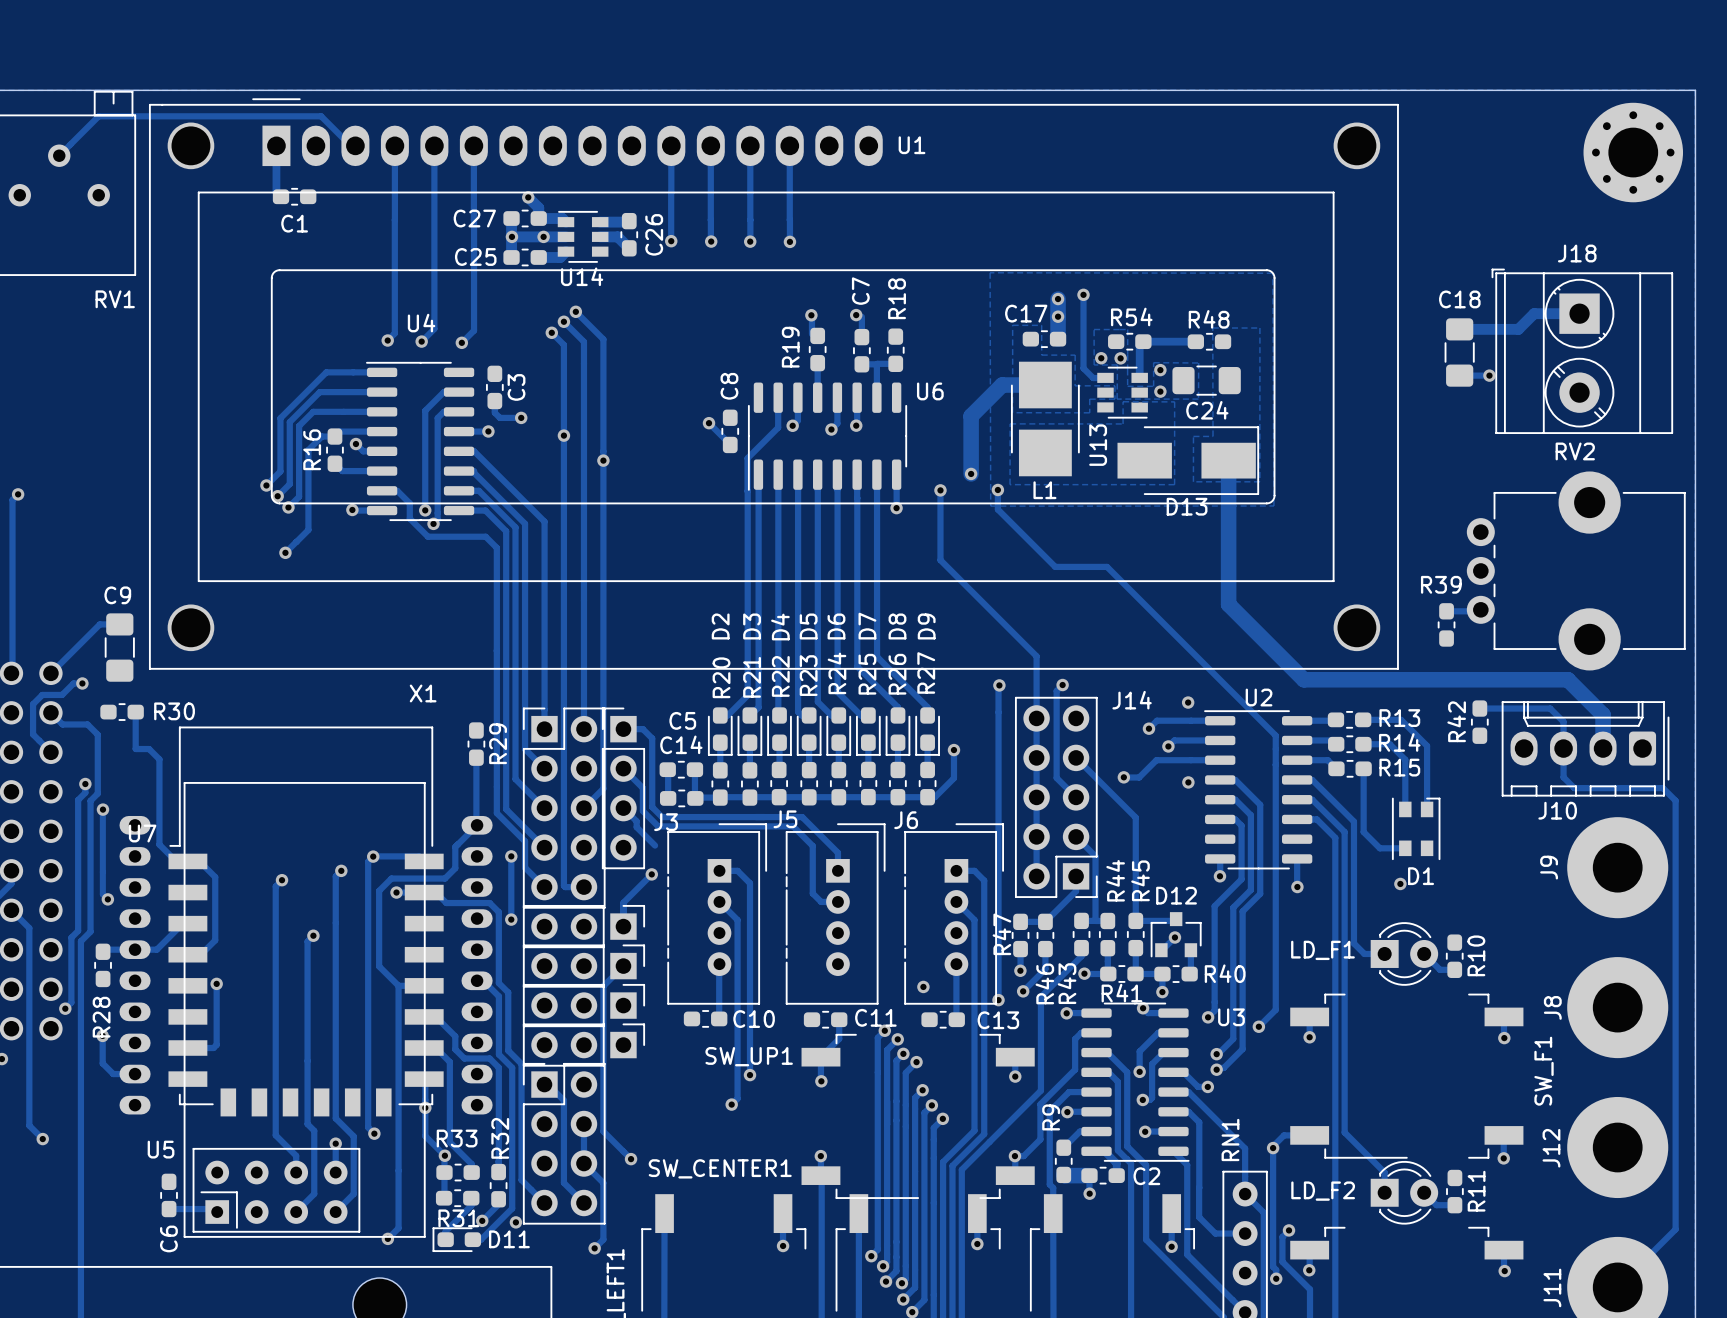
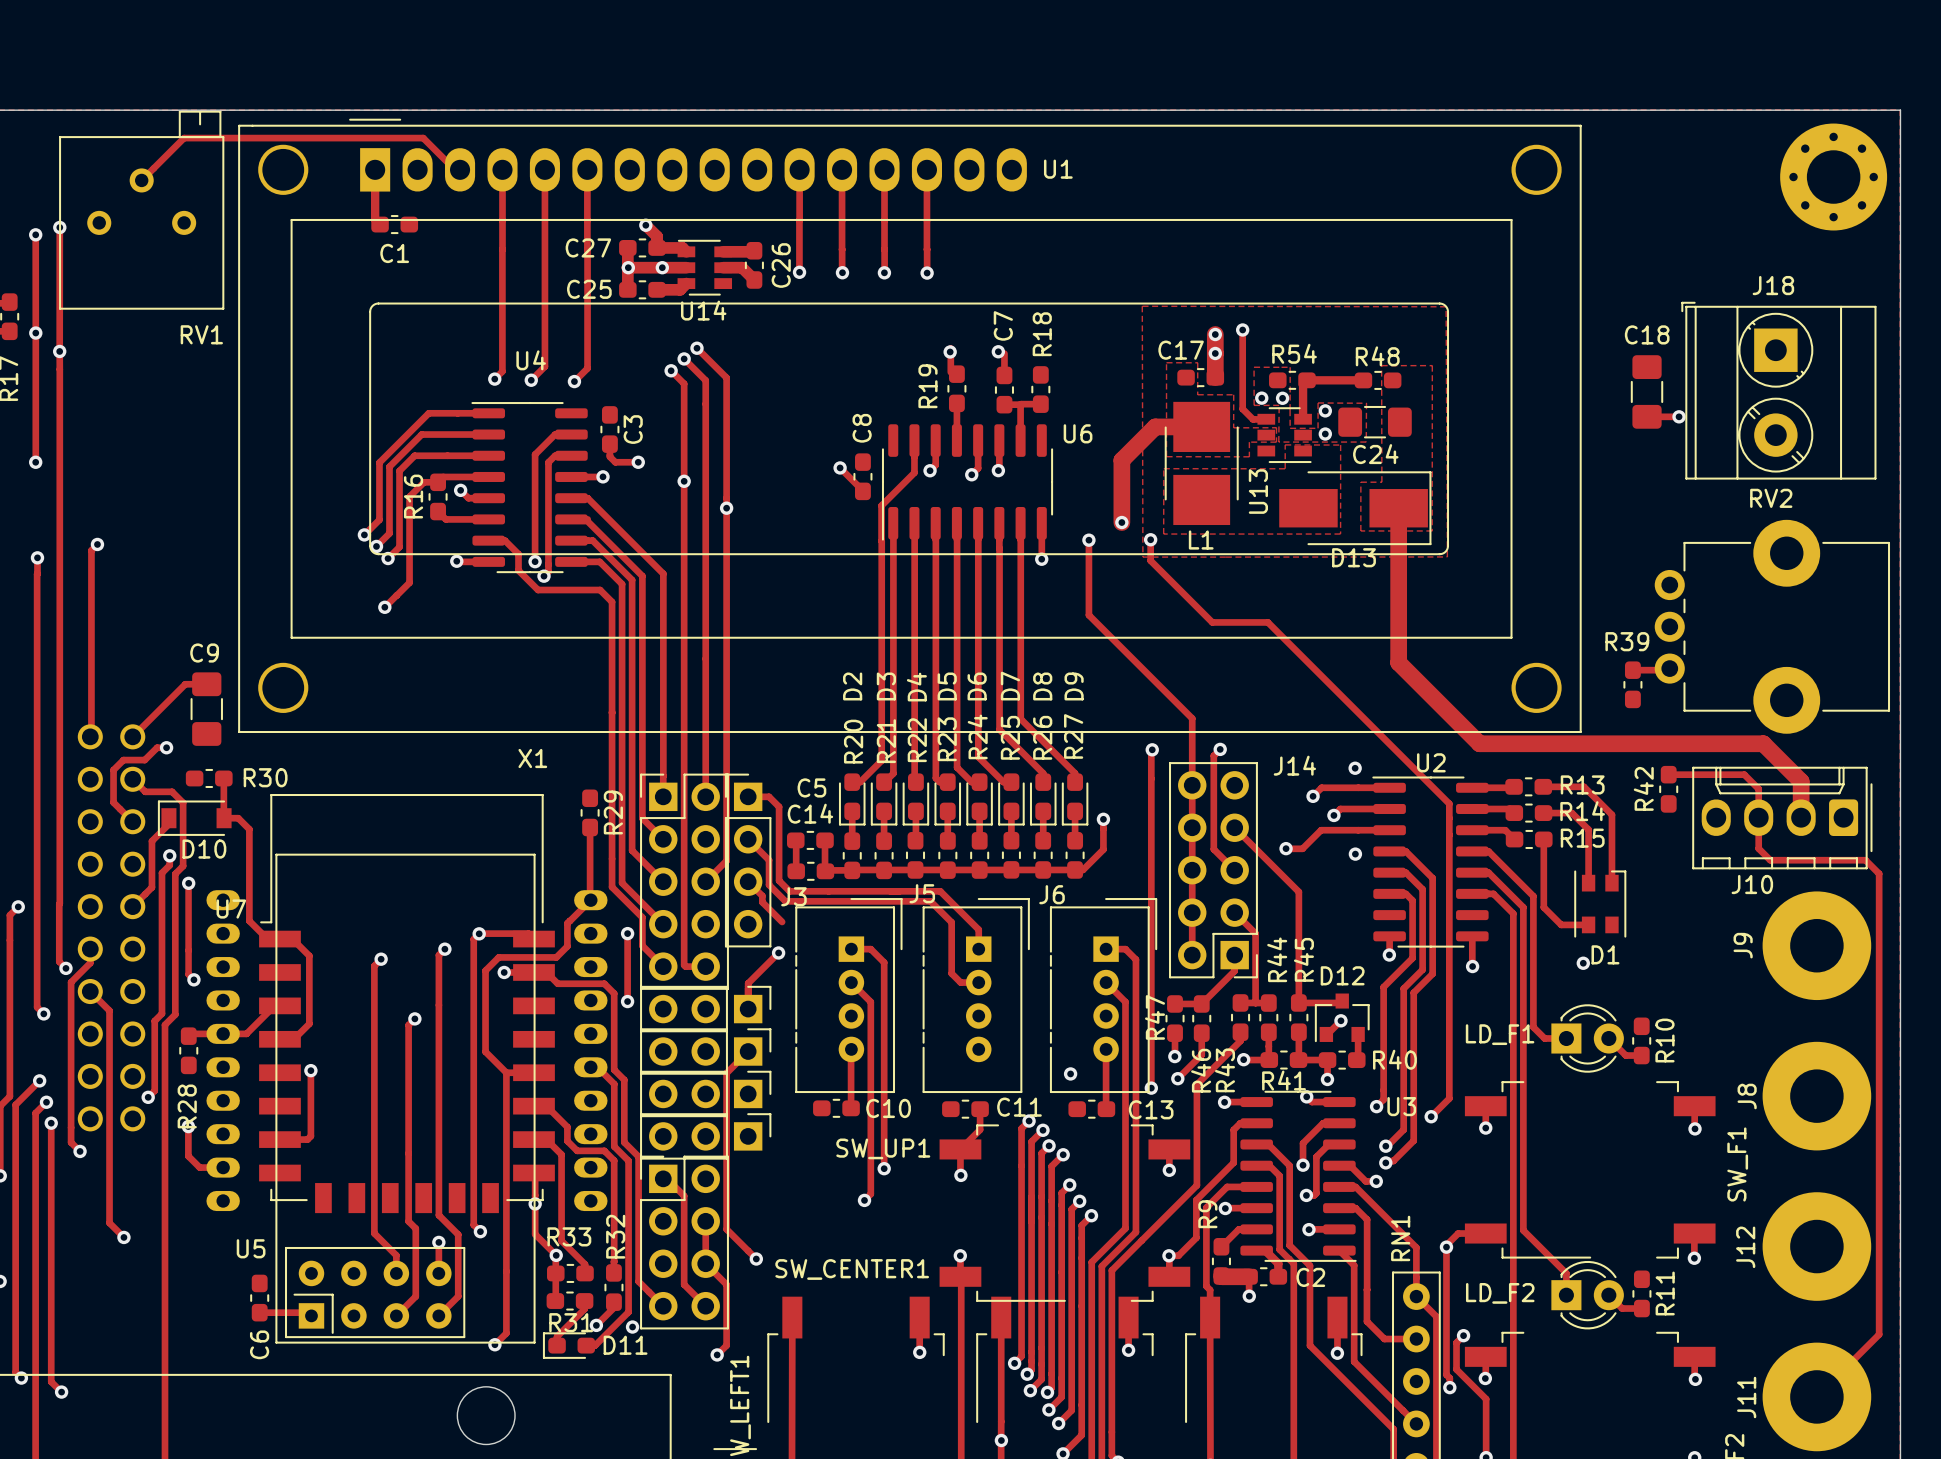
track: (1579, 313) (1534, 313) (1518, 329) (1459, 329) -> none
track: none -> (168, 818) (168, 824) (151, 841) (151, 887) (132, 906)
D10: none -> (194, 818)

